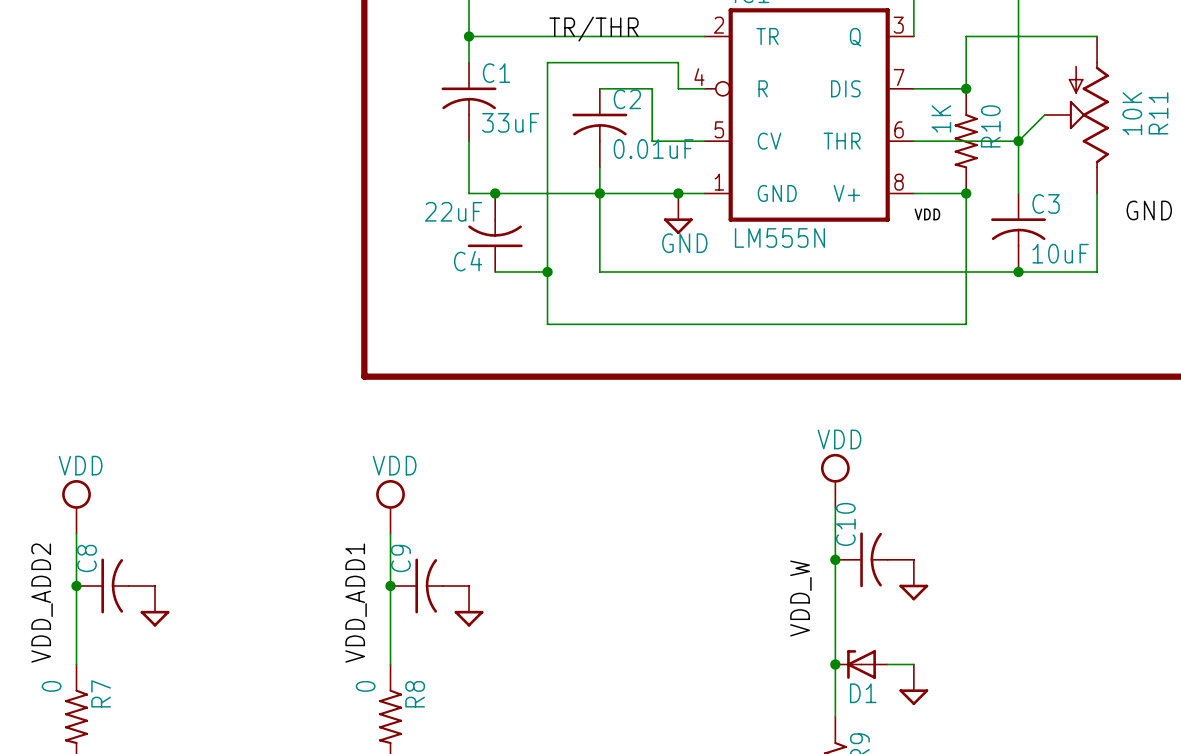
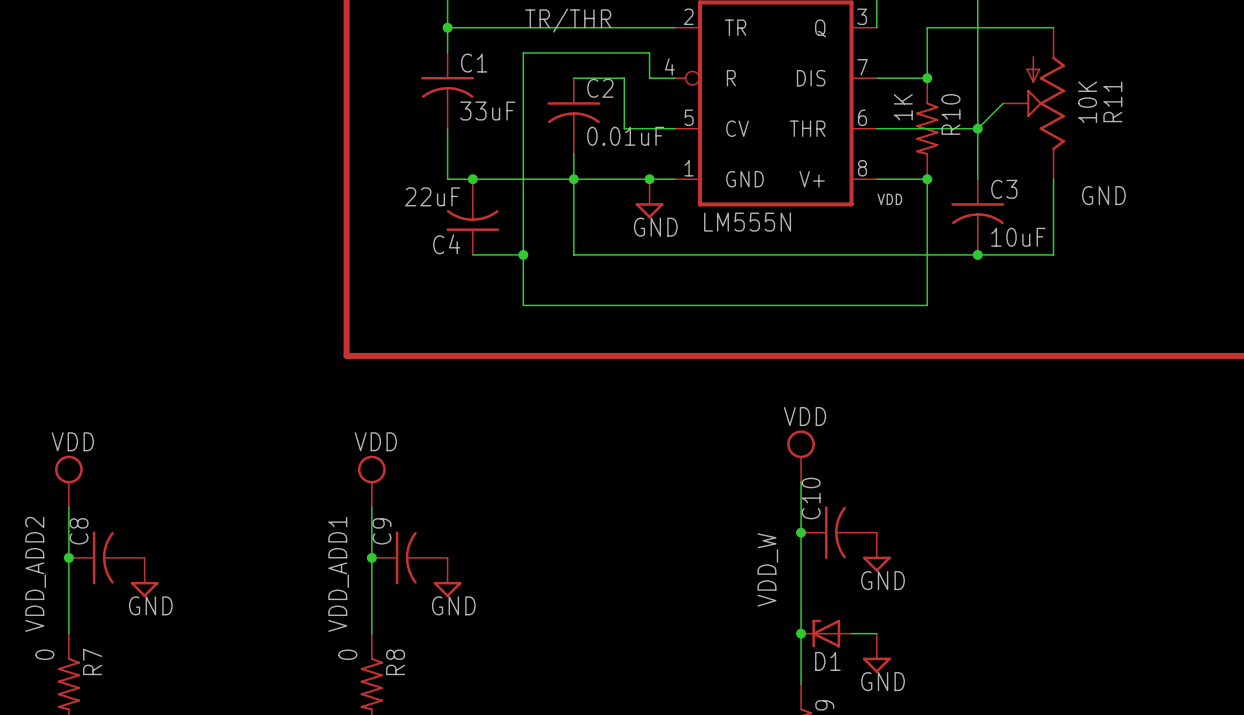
power symbol text: none -> GND (883, 580)
power symbol text: none -> GND (150, 605)
power symbol text: none -> GND (453, 605)
power symbol text: none -> GND (883, 681)

